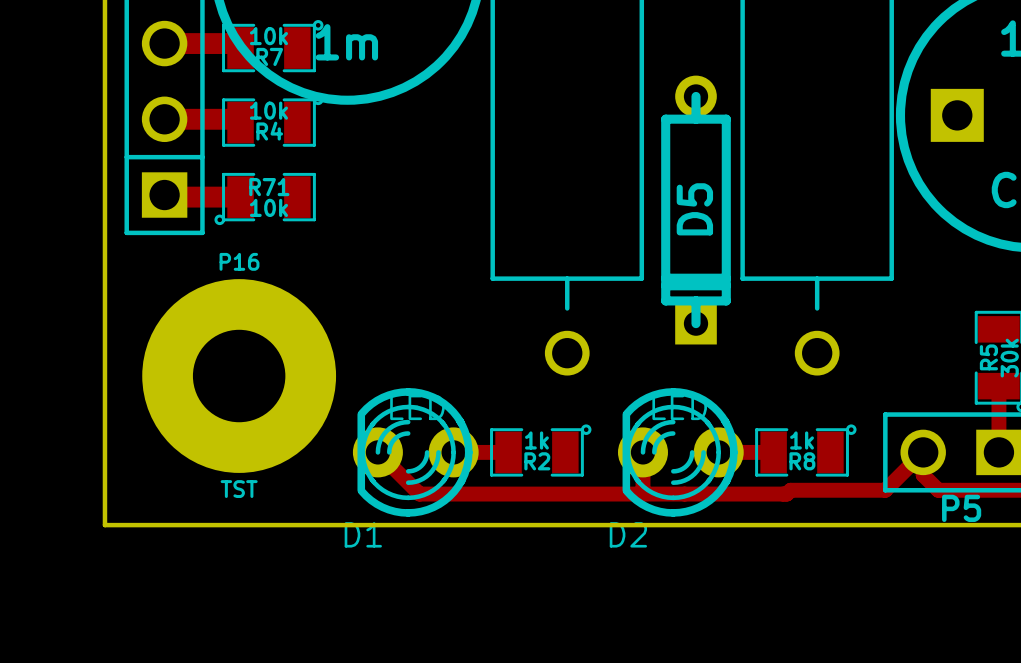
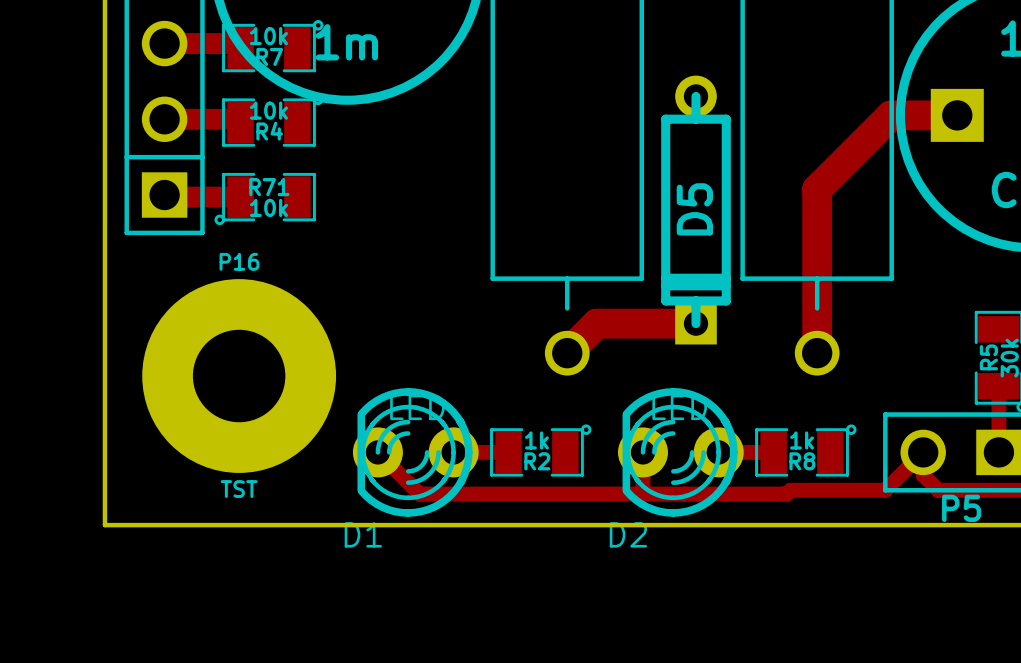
track: none -> (957, 115) (891, 115) (817, 189) (817, 353)
track: none -> (696, 323) (596, 323) (567, 353)

